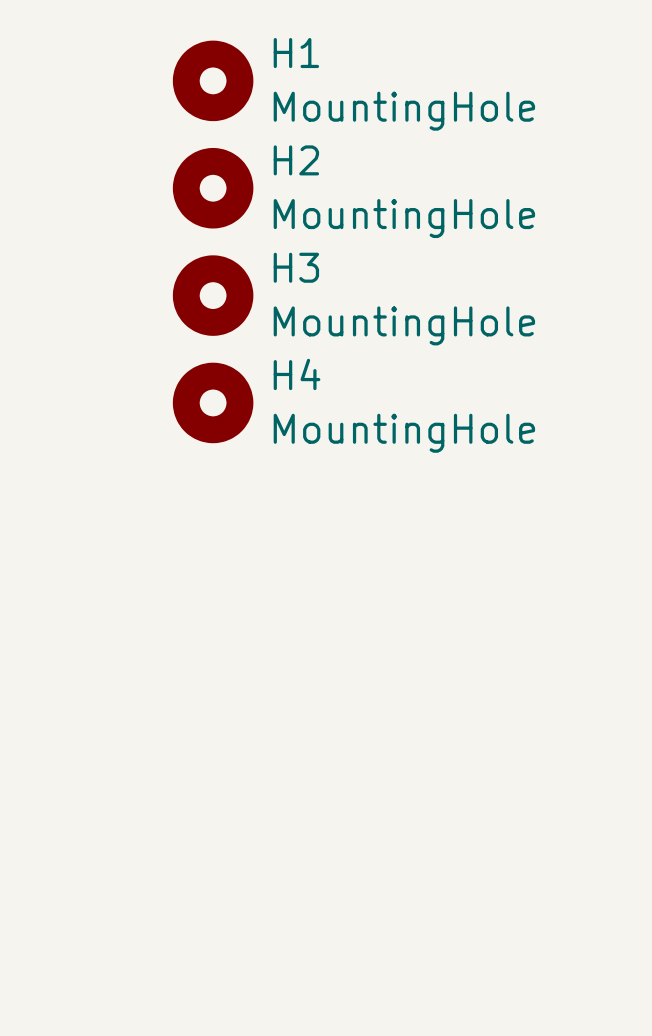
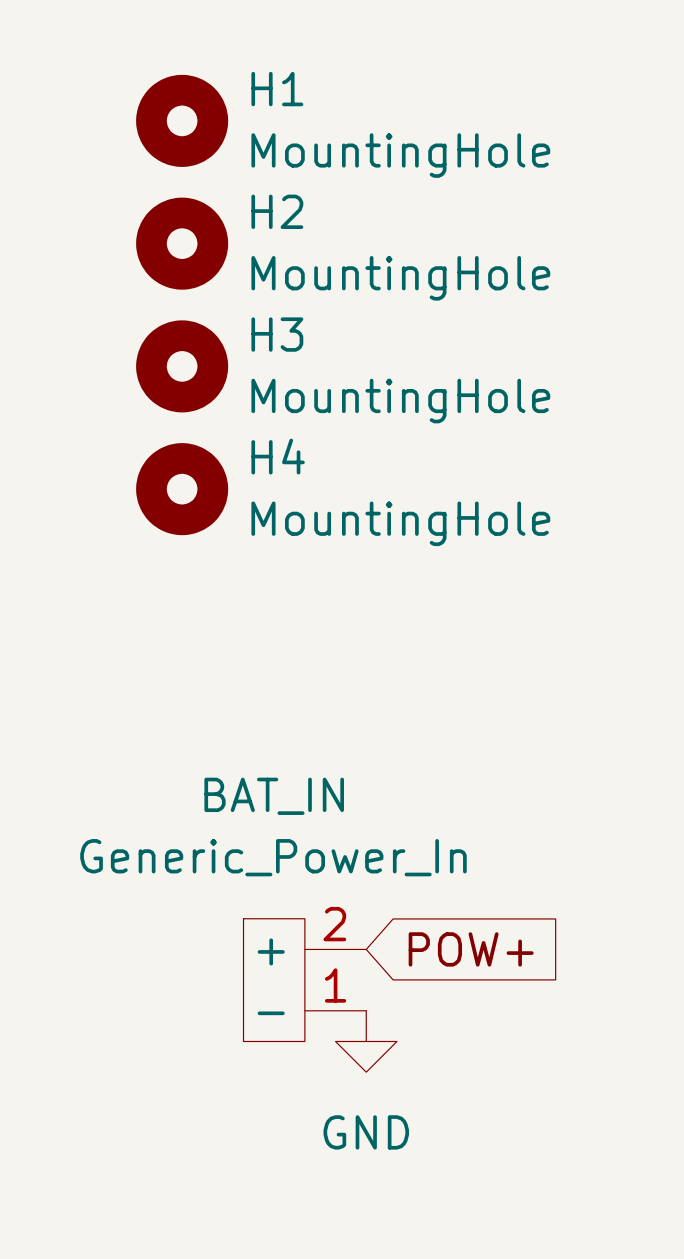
global label: none -> POW+ (471, 949)
BAT_IN: none -> Generic_Power_In (304, 980)
power symbol: none -> GND (366, 1041)

